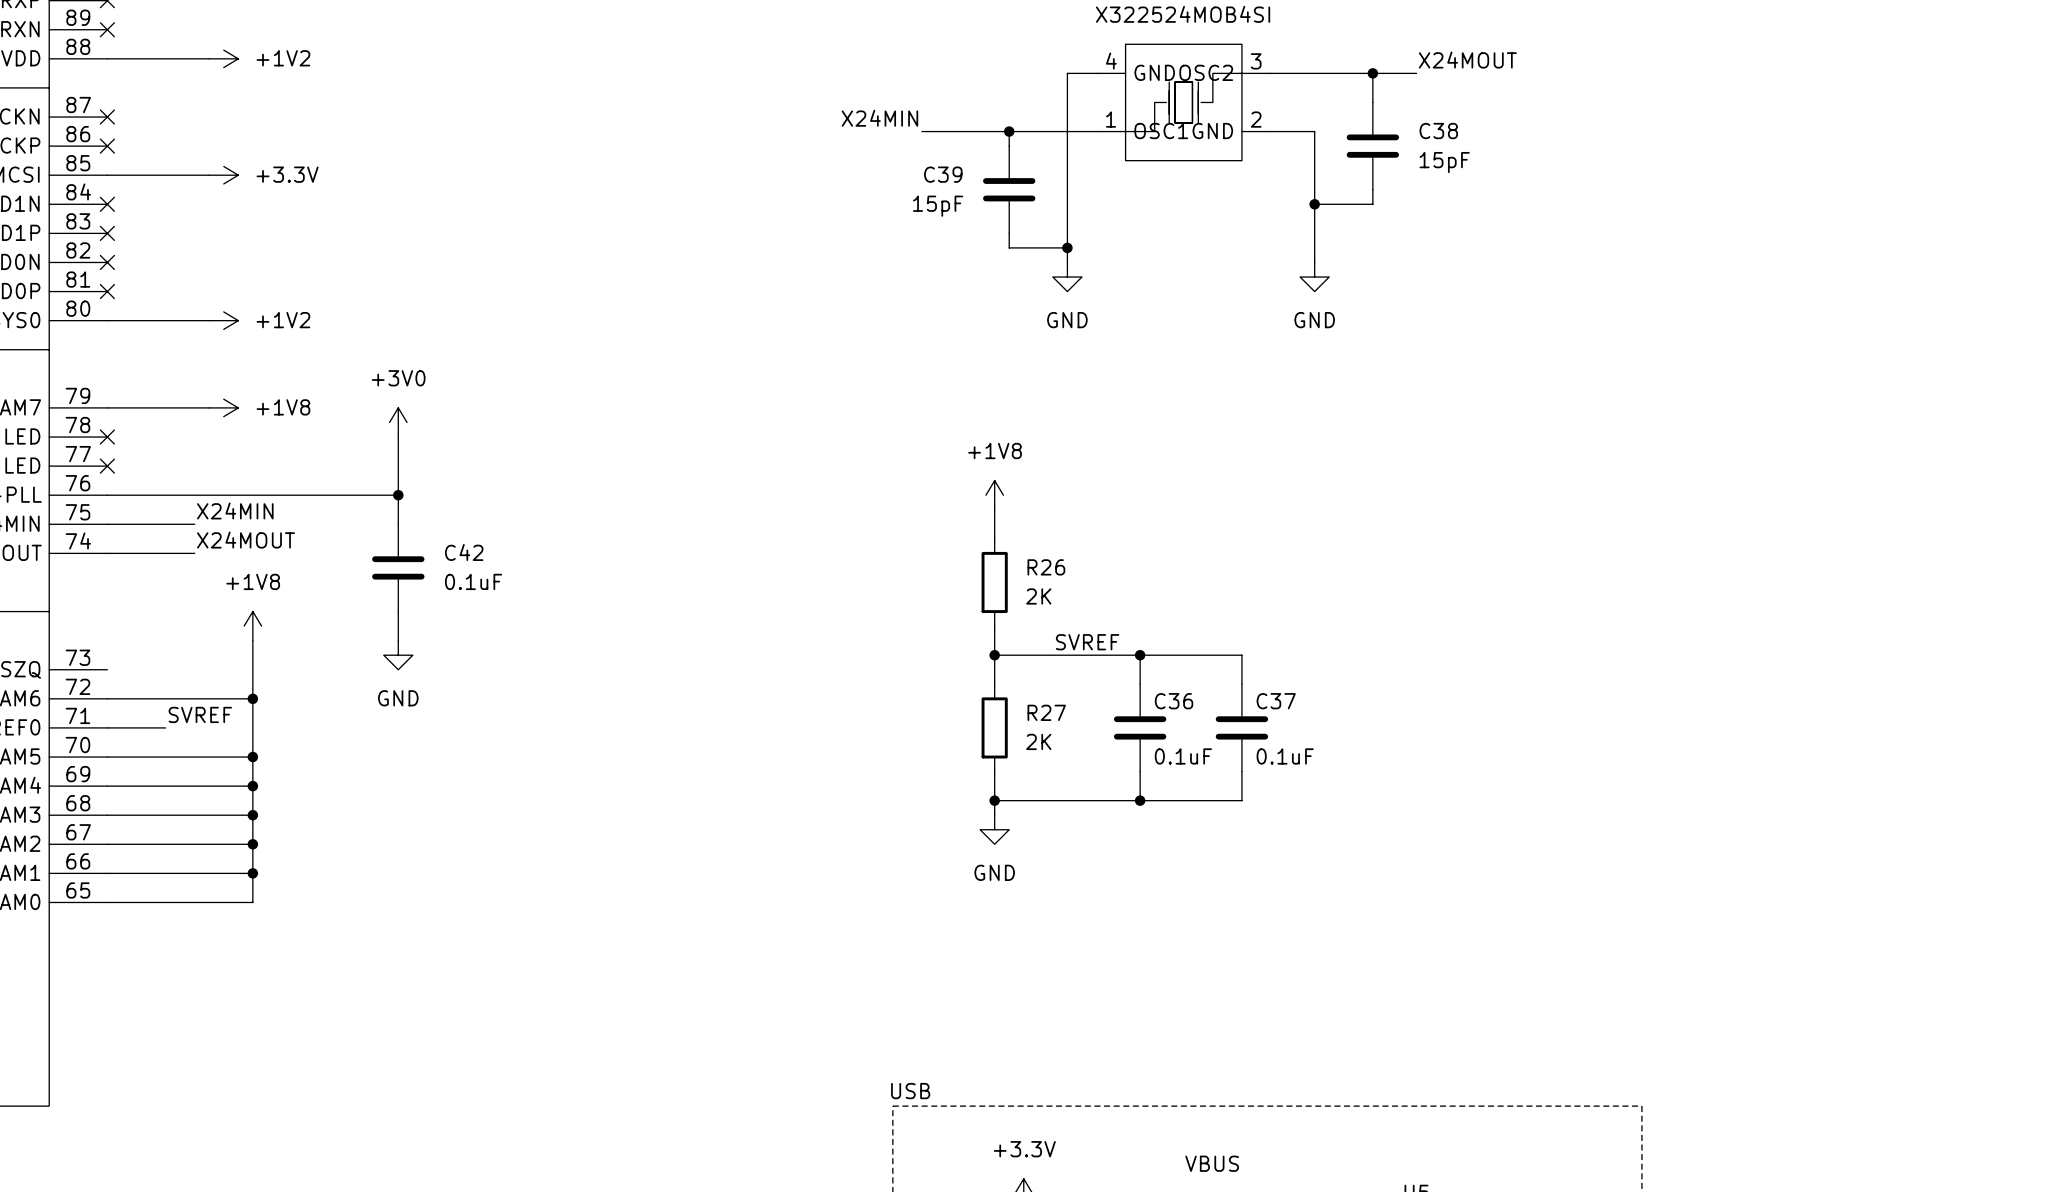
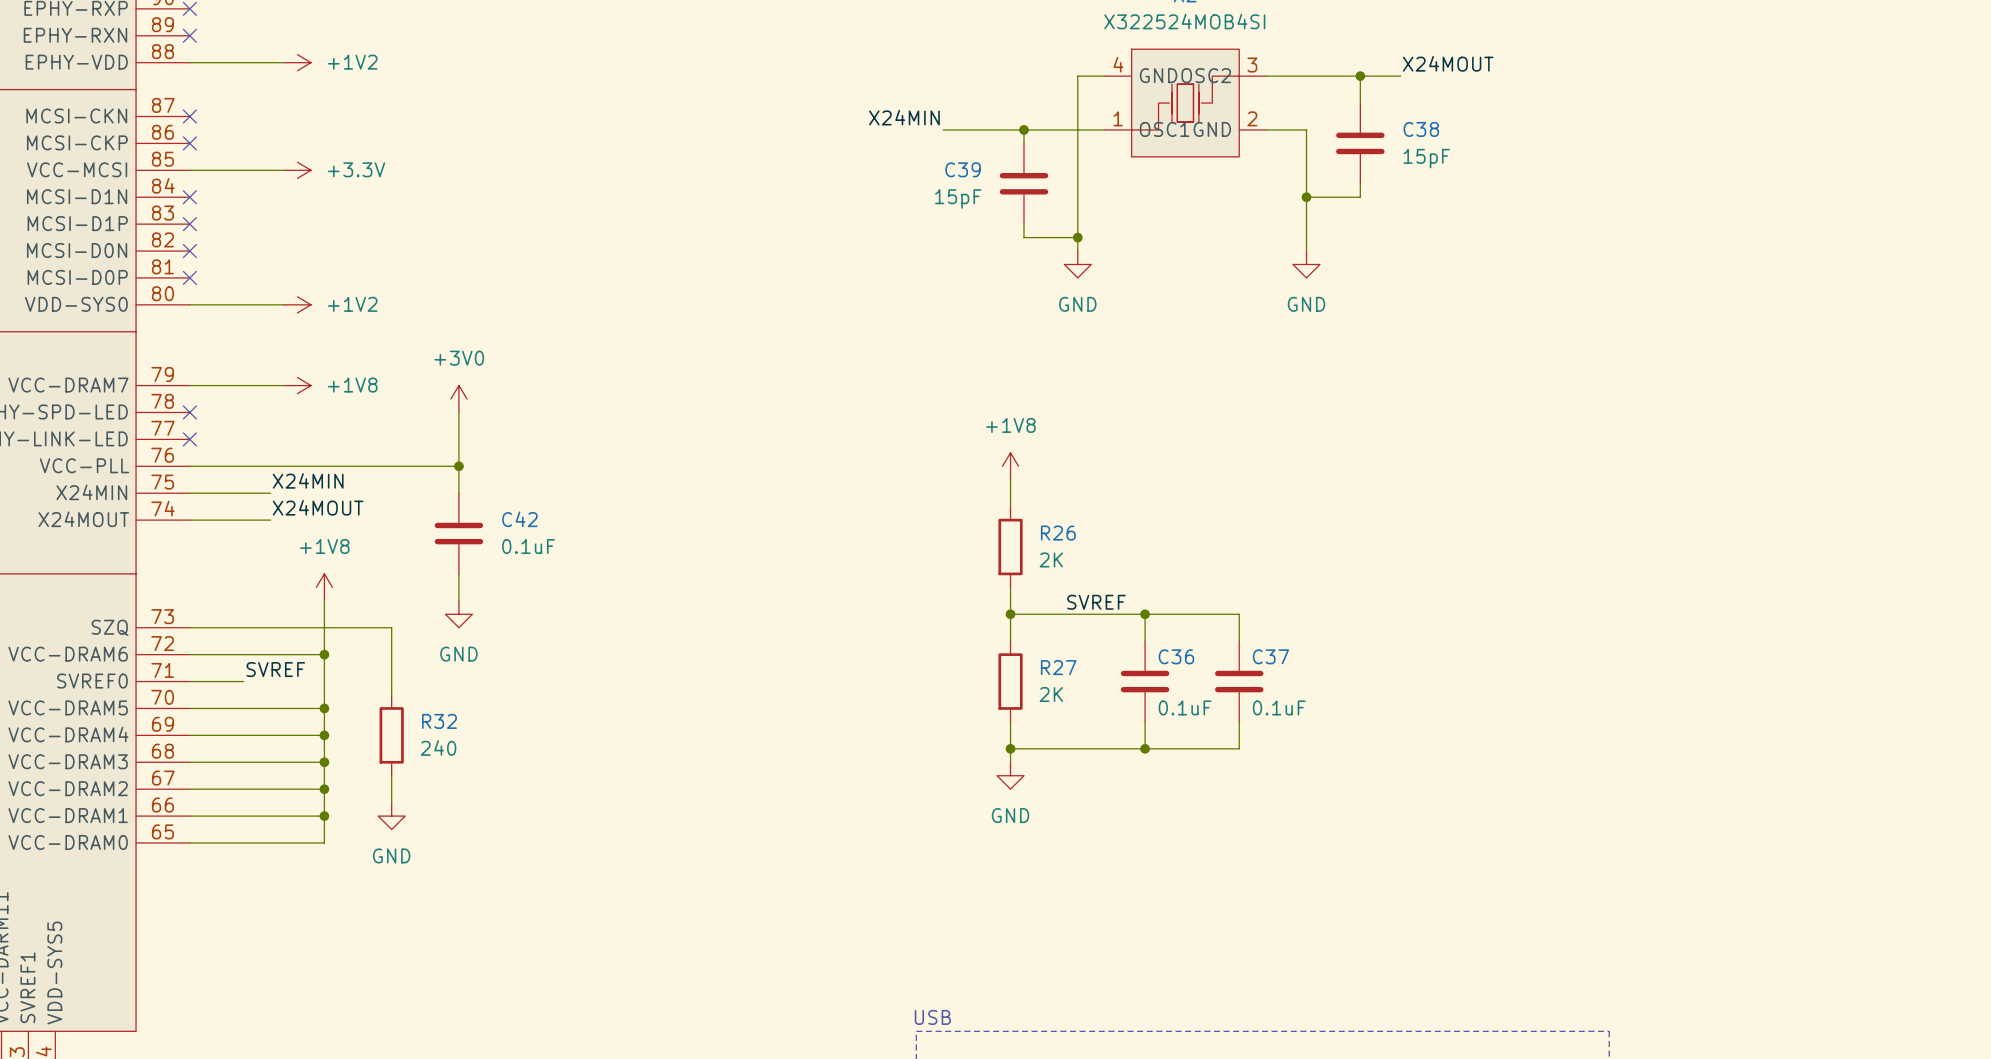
wire: none -> (189, 627) (391, 627) (391, 695)
R32: none -> 240 (391, 735)
wire: none -> (391, 775) (391, 802)
power symbol: none -> GND (391, 816)

